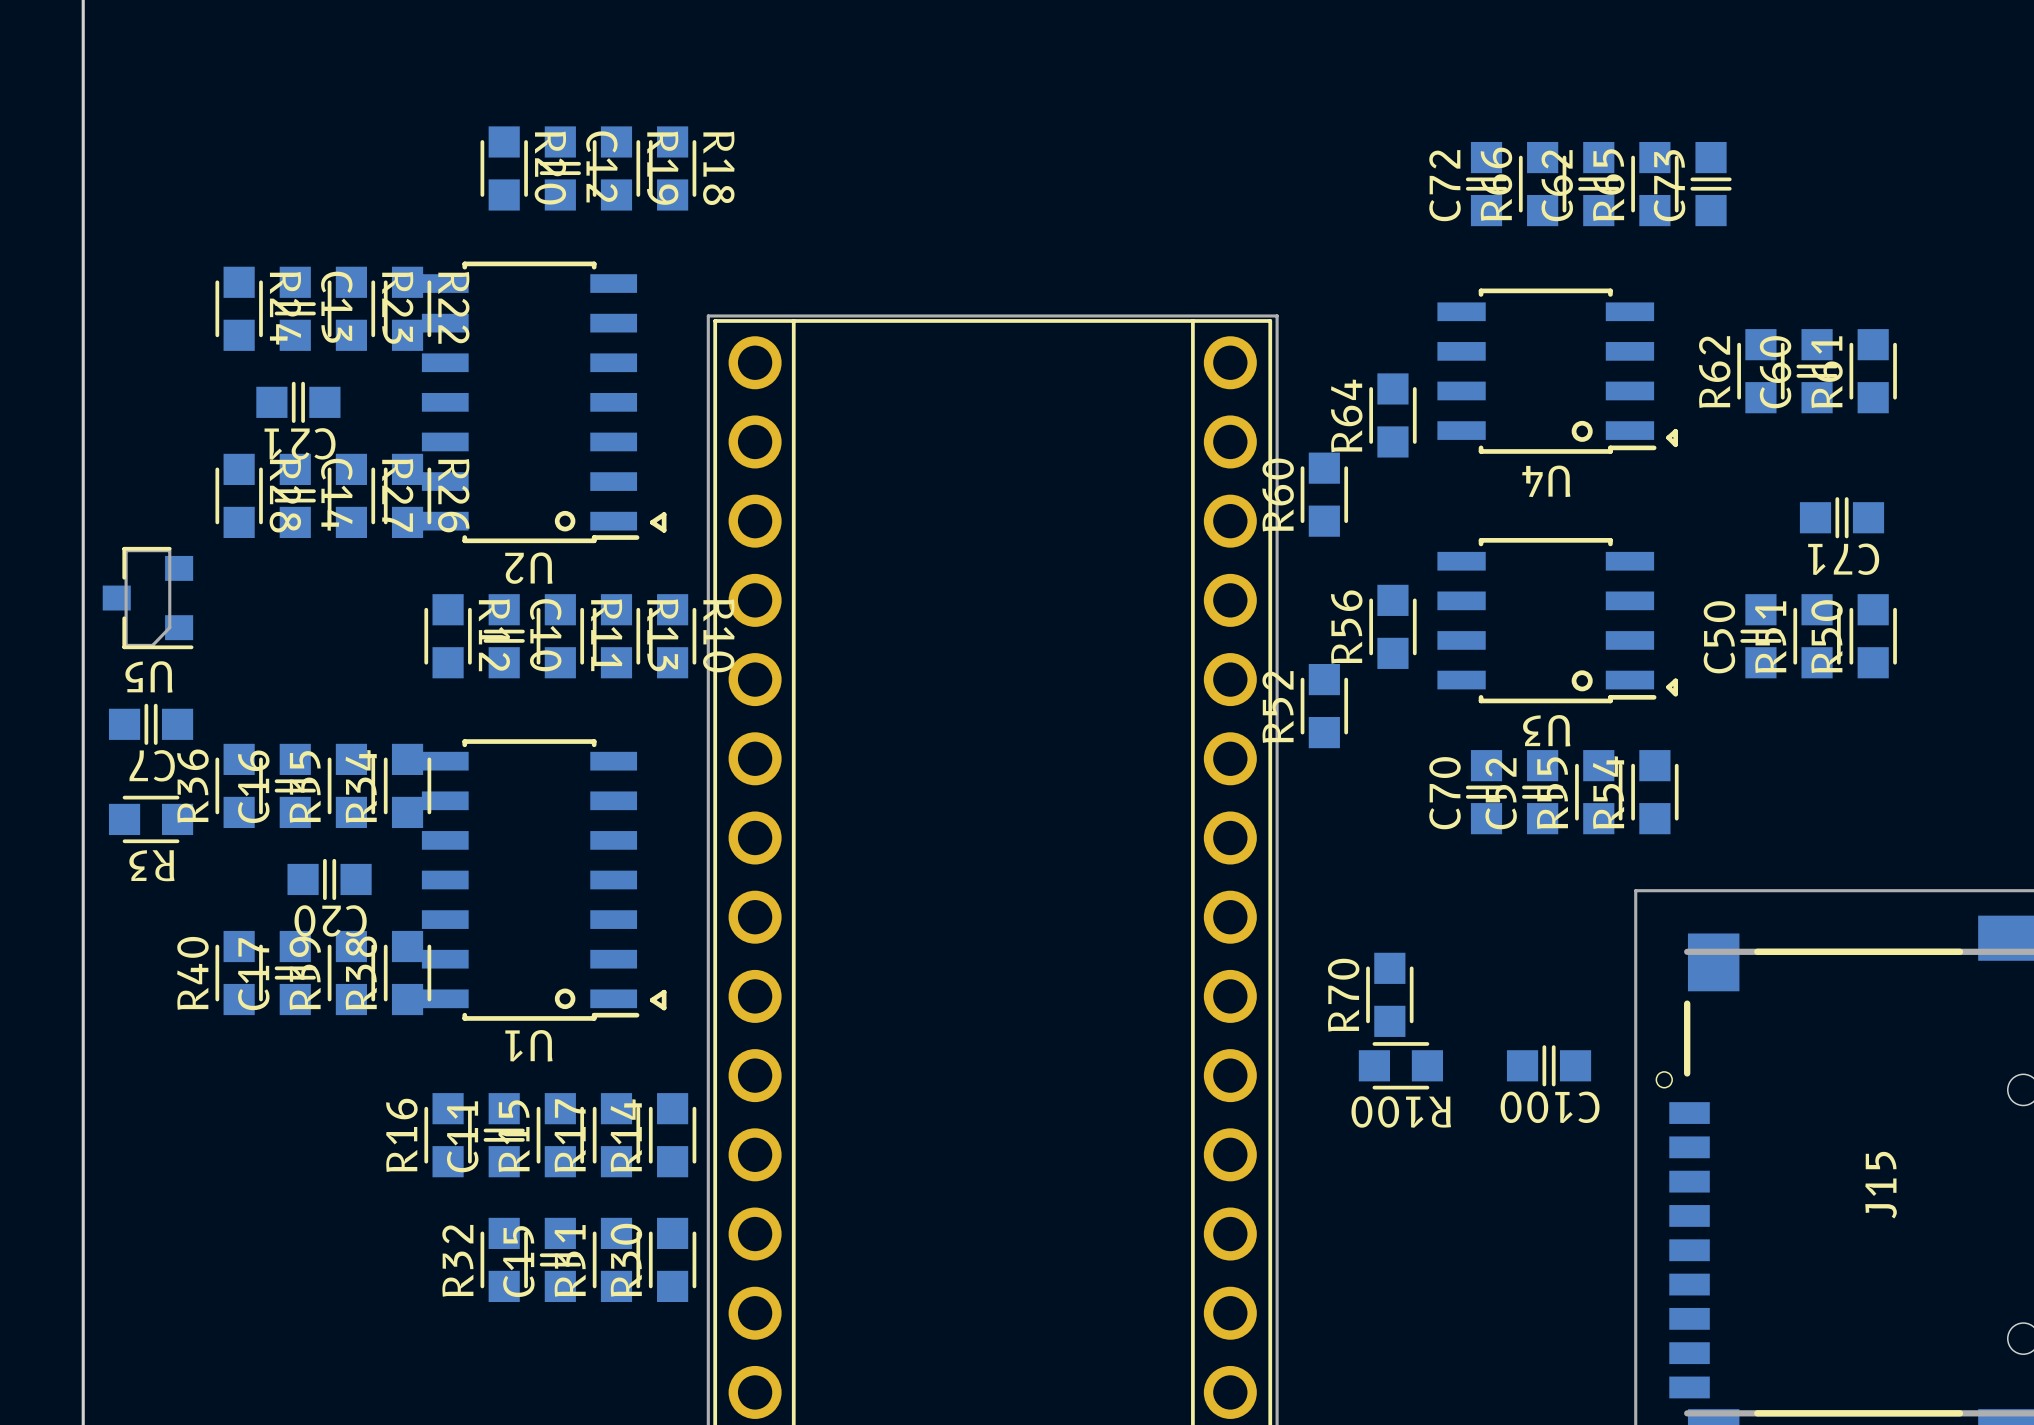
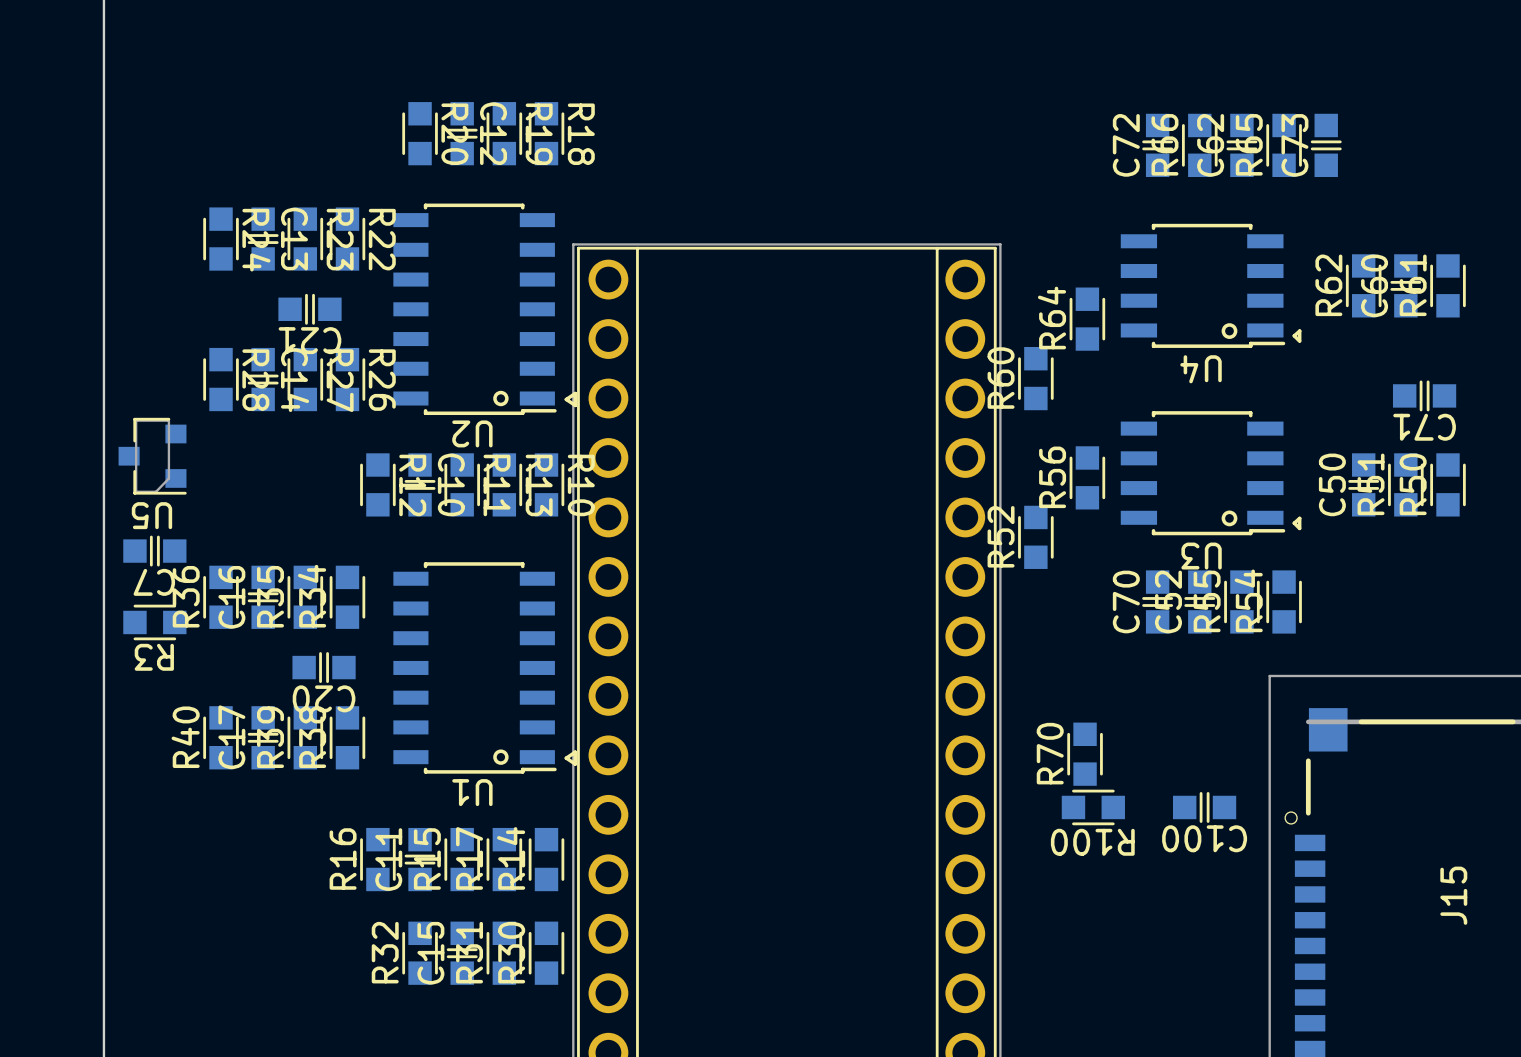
C21 position: (298, 402) -> (310, 309)
U2 position: (544, 402) -> (485, 309)
C20 position: (329, 879) -> (324, 667)
U1 position: (544, 880) -> (485, 667)

